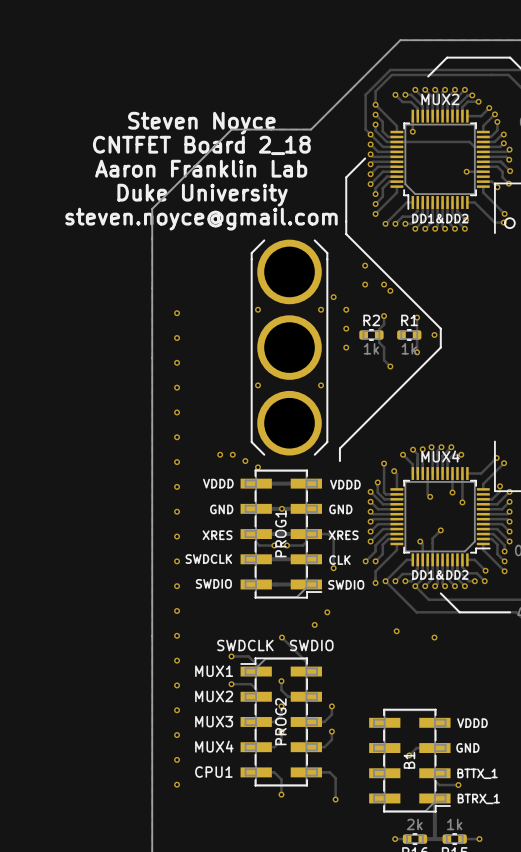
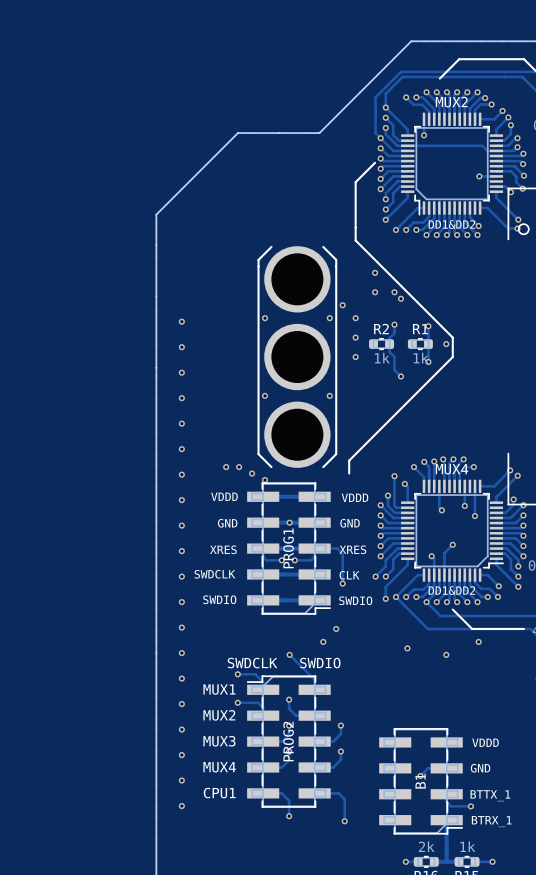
text: Steven Noyce (201, 123) -> none
text: CNTFET Board 2_18 (201, 145) -> none
text: Aaron Franklin Lab (201, 168) -> none
text: Duke University (202, 195) -> none
text: steven.noyce@gmail.com (201, 219) -> none
via: none -> (478, 641)

